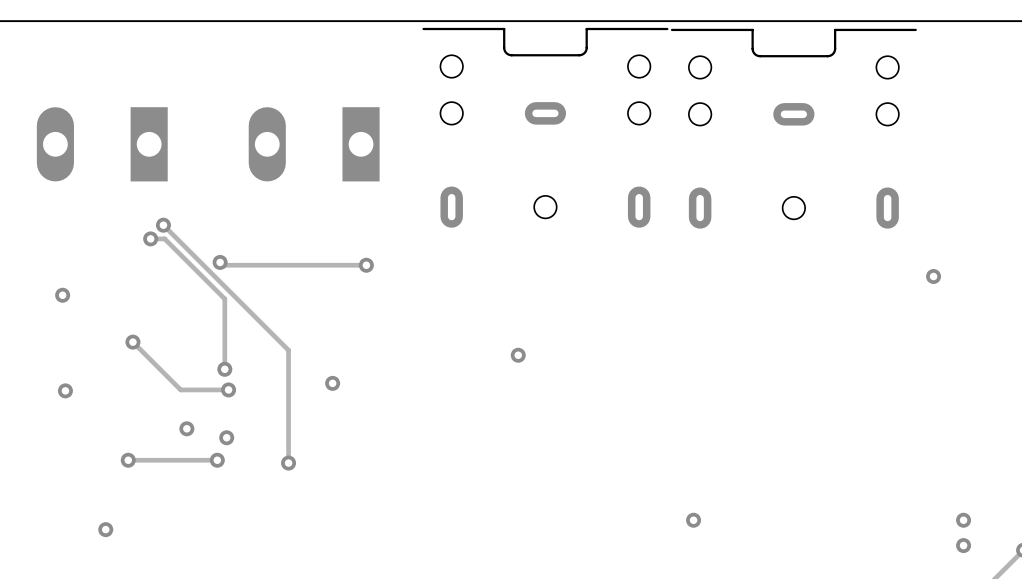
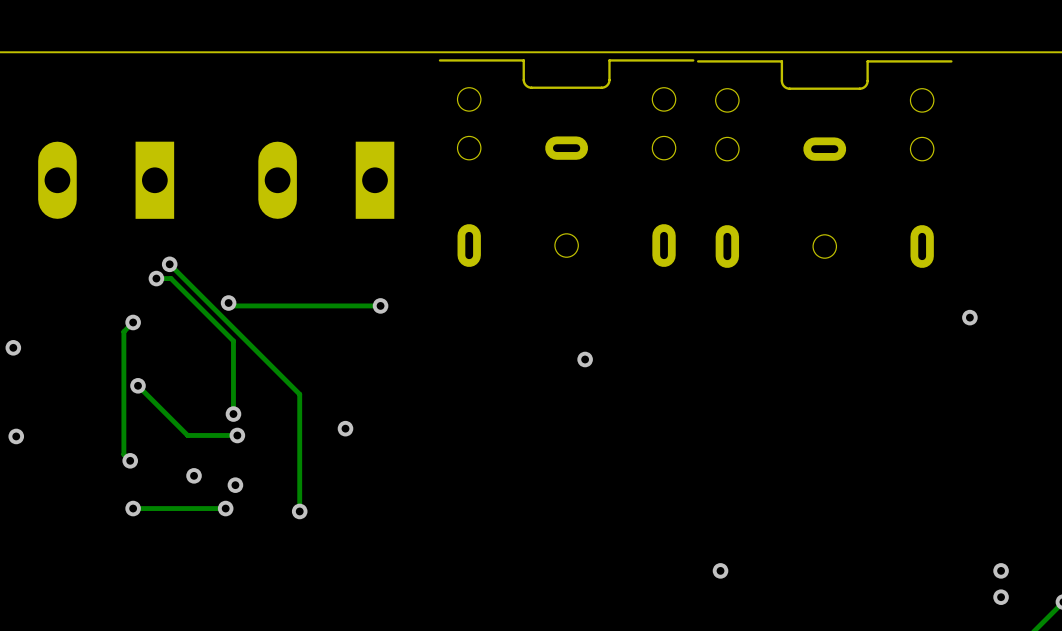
track: none -> (133, 322) (123, 331) (123, 454) (130, 460)
via: none -> (133, 322)
via: (62, 295) -> none
via: none -> (13, 347)
via position: (518, 355) -> (585, 359)
via: none -> (16, 436)
via: (65, 390) -> none
via: none -> (130, 460)
via: (105, 529) -> none

